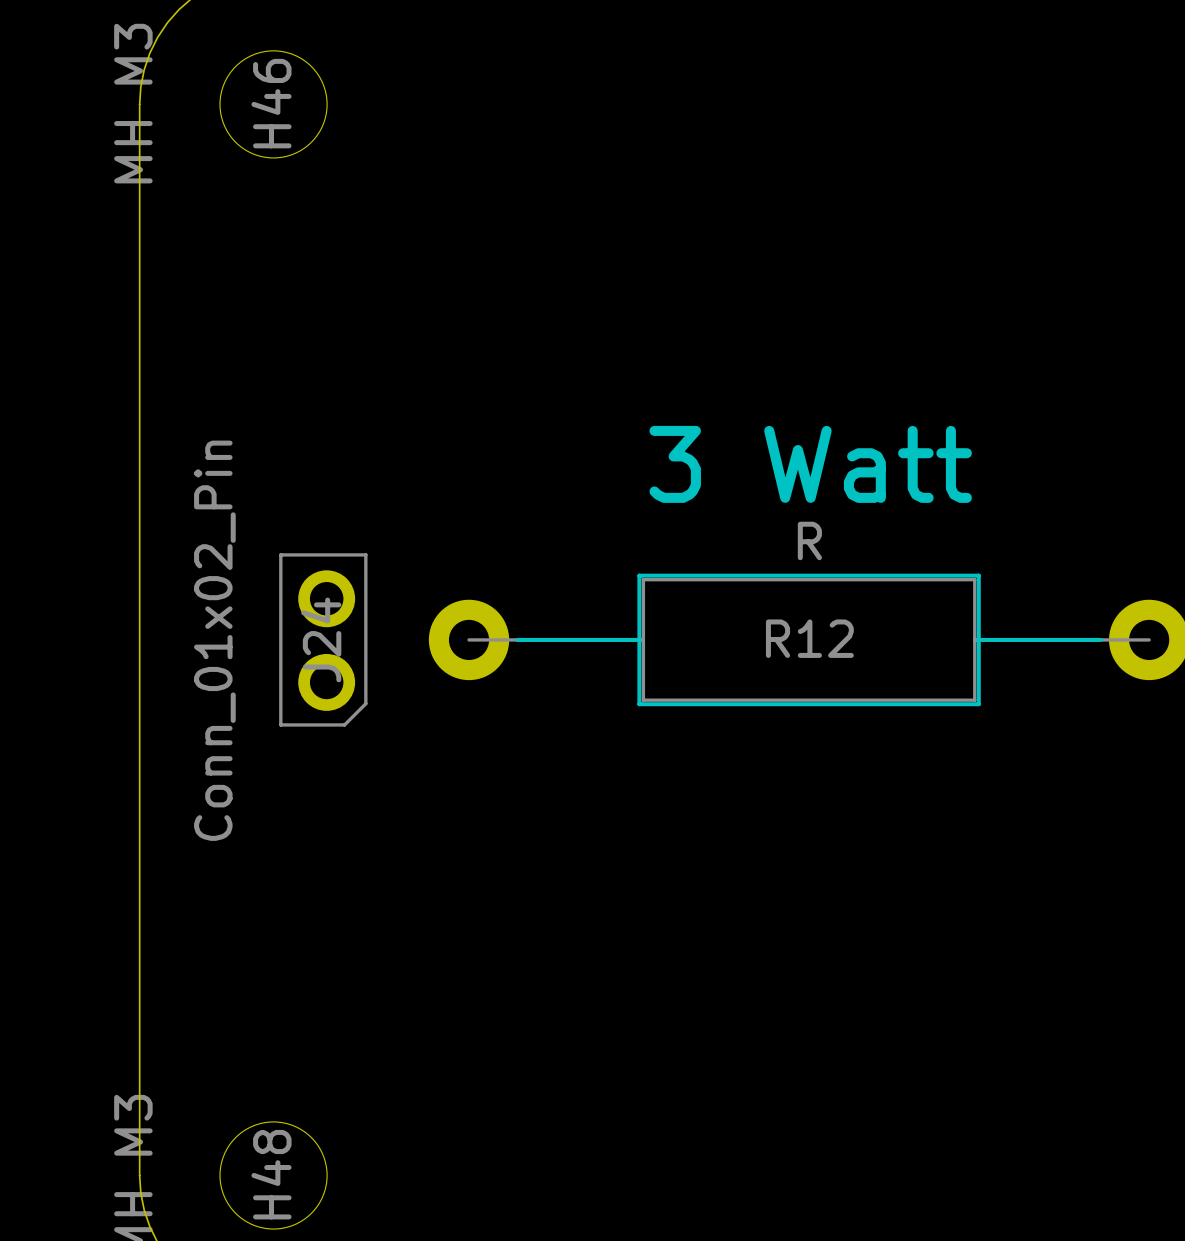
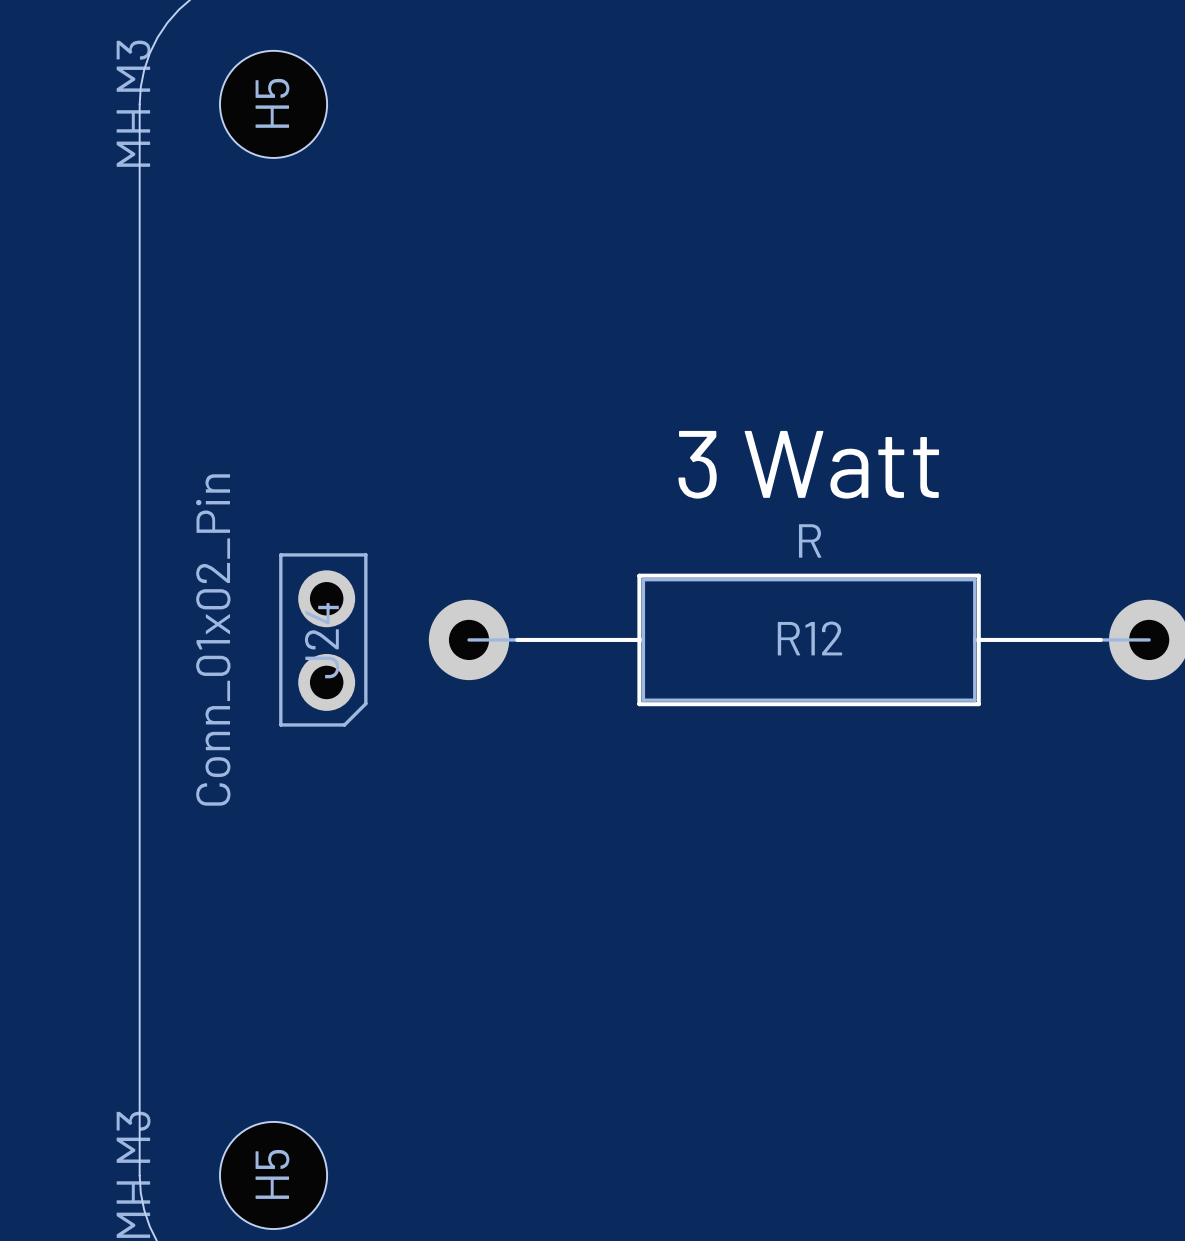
H46 name: H46 (271, 103) -> H5 (272, 103)
H48 name: H48 (271, 1174) -> H5 (272, 1174)

